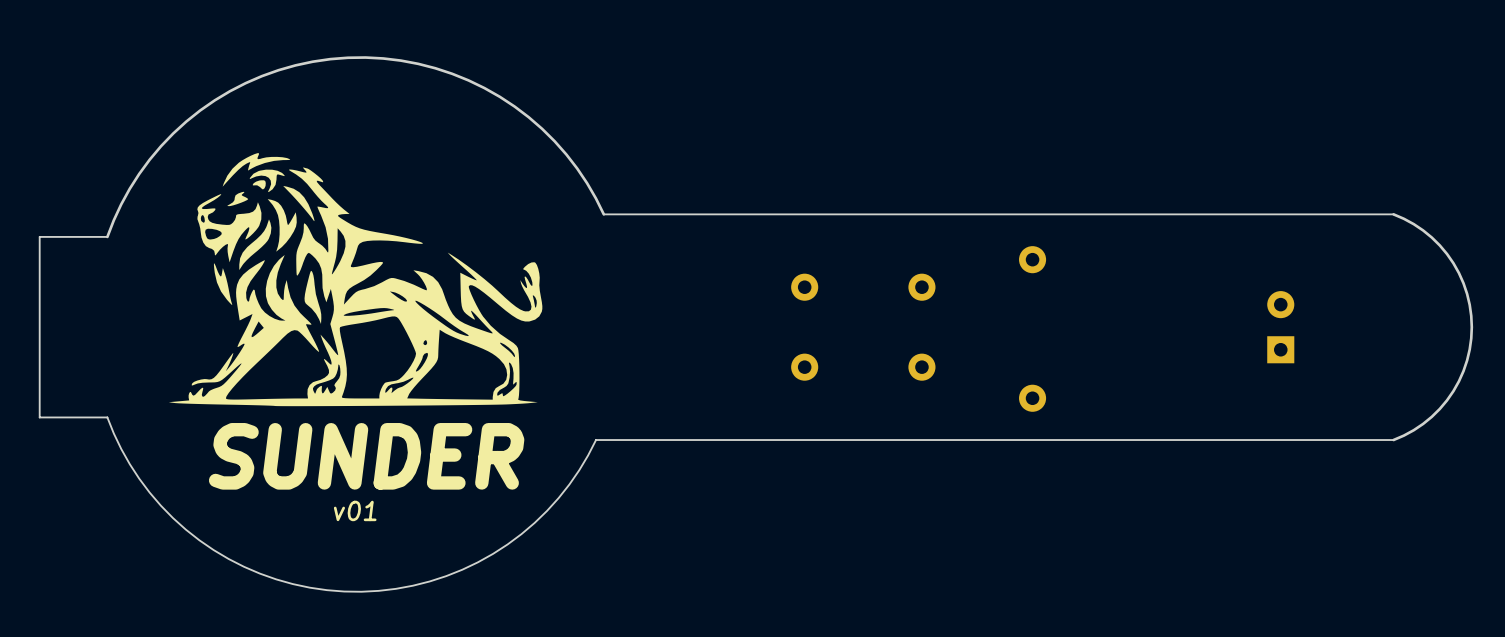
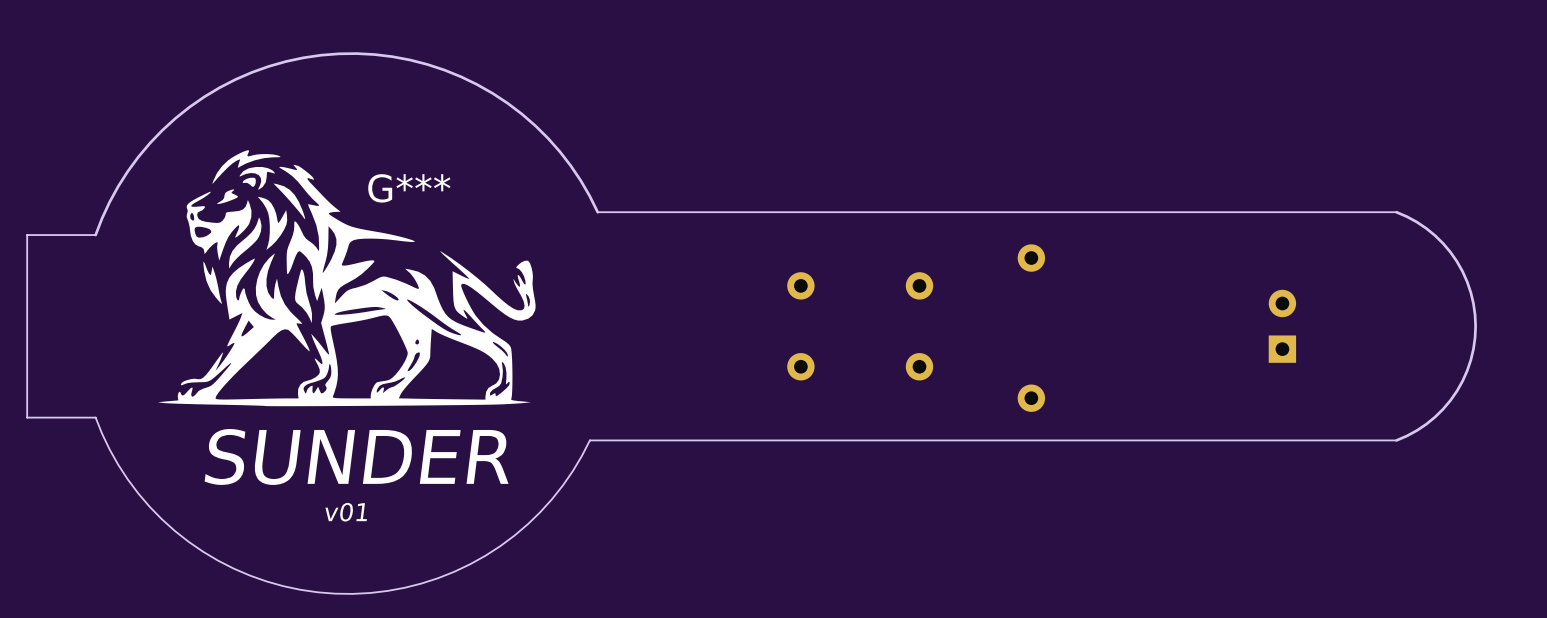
G***: none -> (346, 278)

